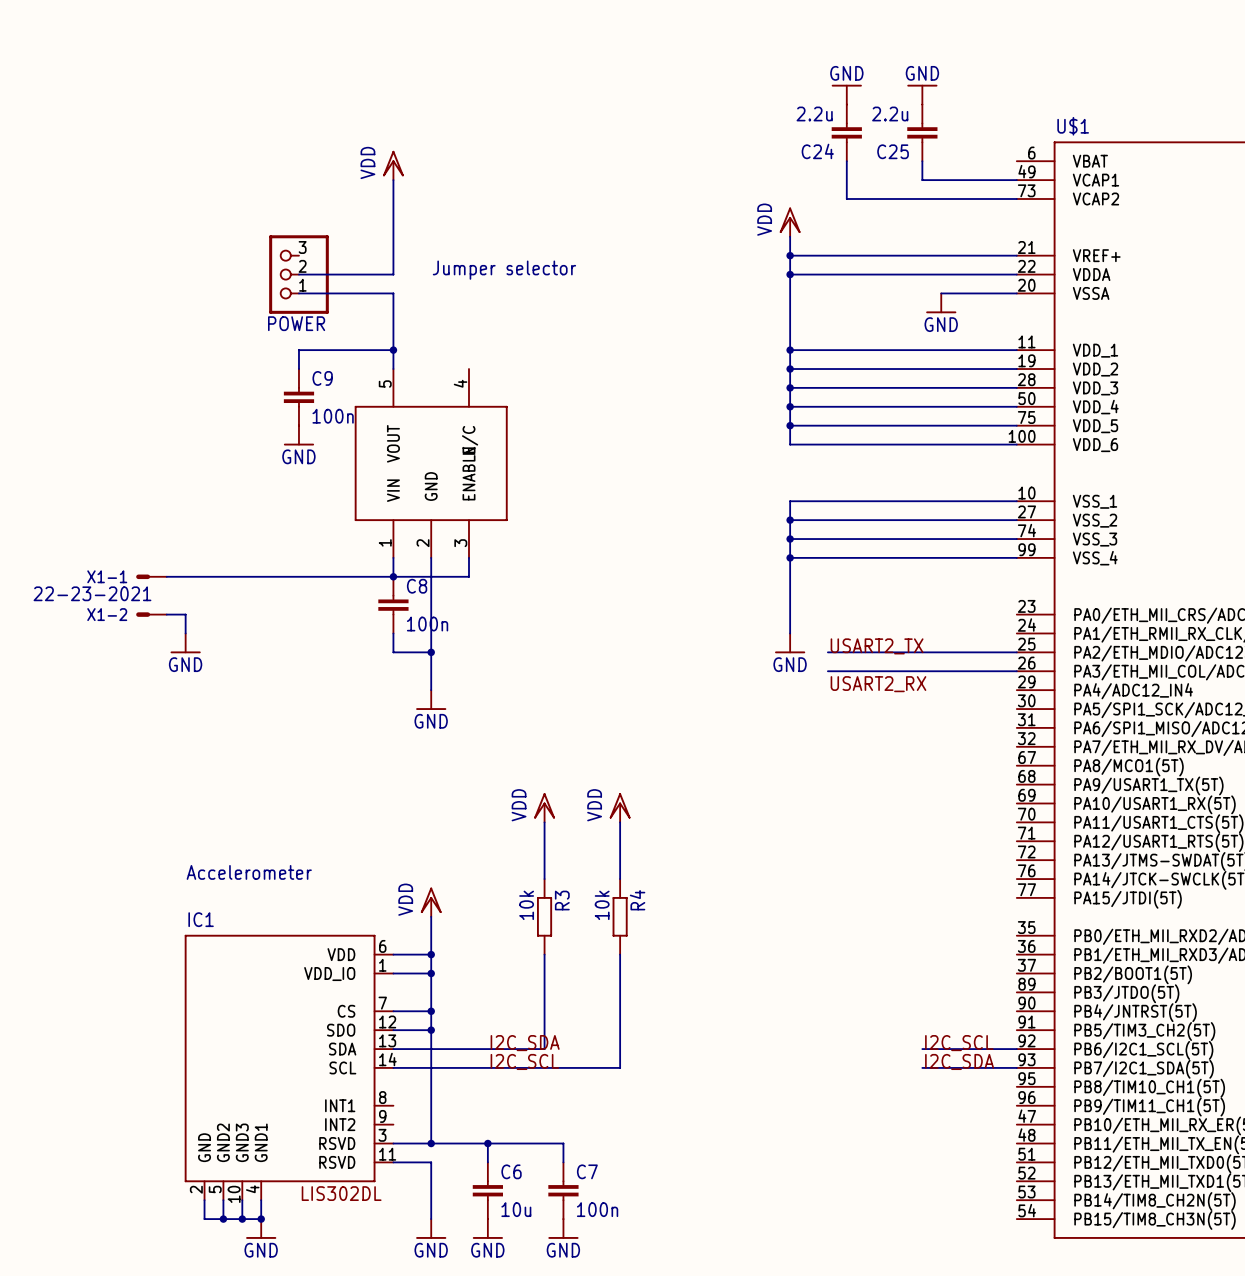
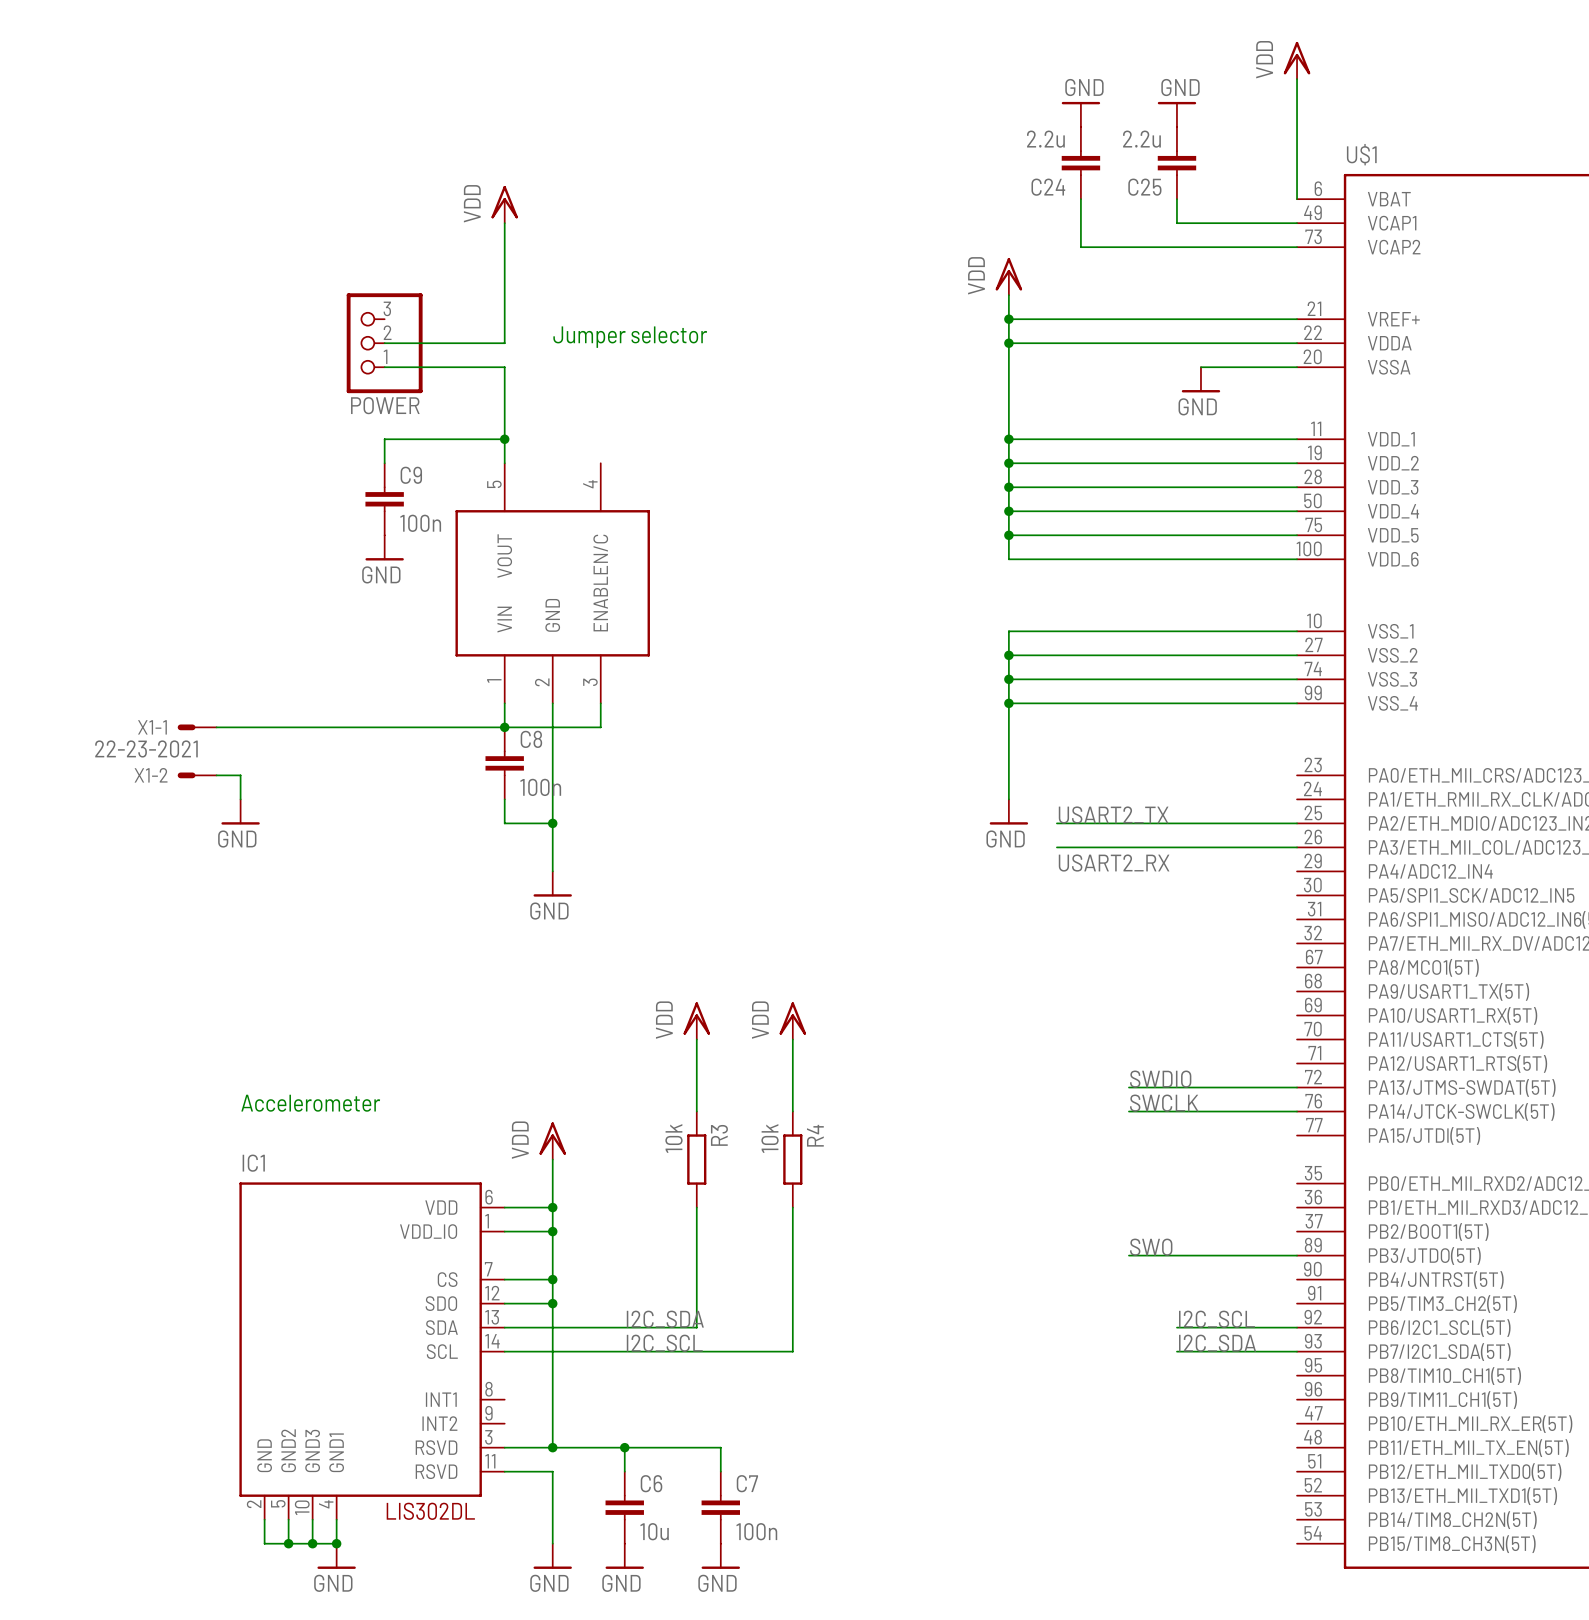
power symbol: none -> VDD (1297, 60)
wire: none -> (1297, 79) (1297, 199)
label: none -> SWDIO (1160, 1079)
wire: none -> (1128, 1087) (1297, 1087)
label: none -> SWCLK (1164, 1103)
wire: none -> (1128, 1111) (1297, 1111)
label: none -> SWO (1151, 1247)
wire: none -> (1128, 1255) (1297, 1255)

